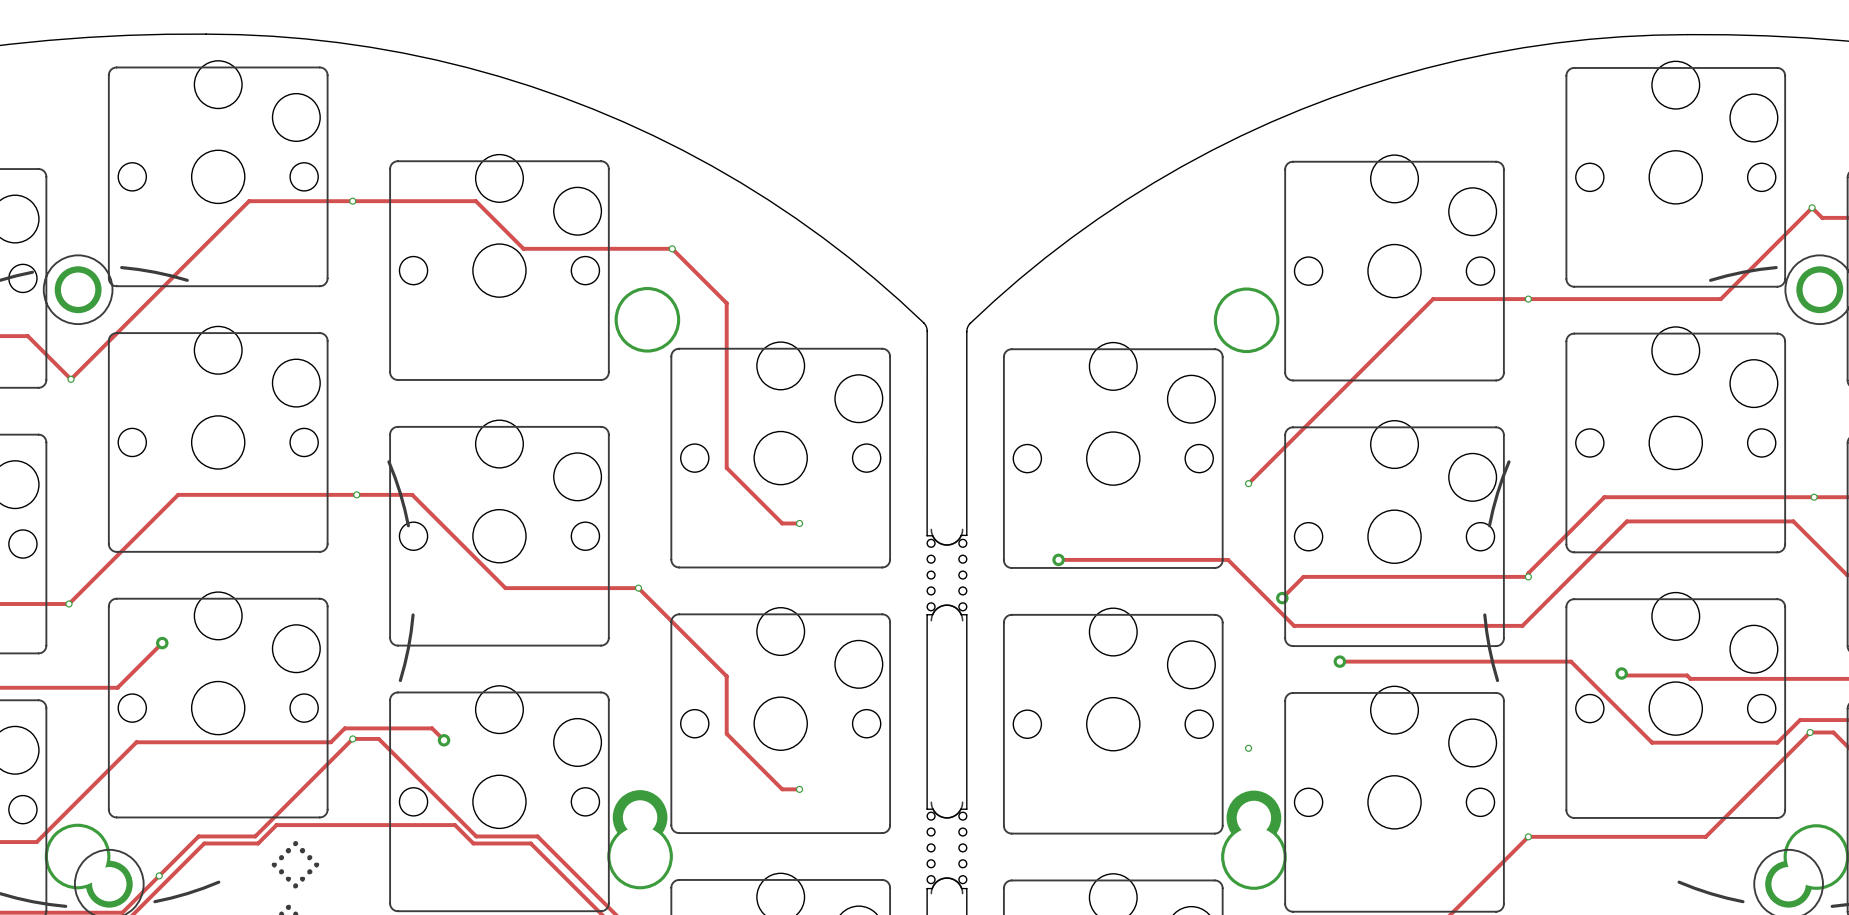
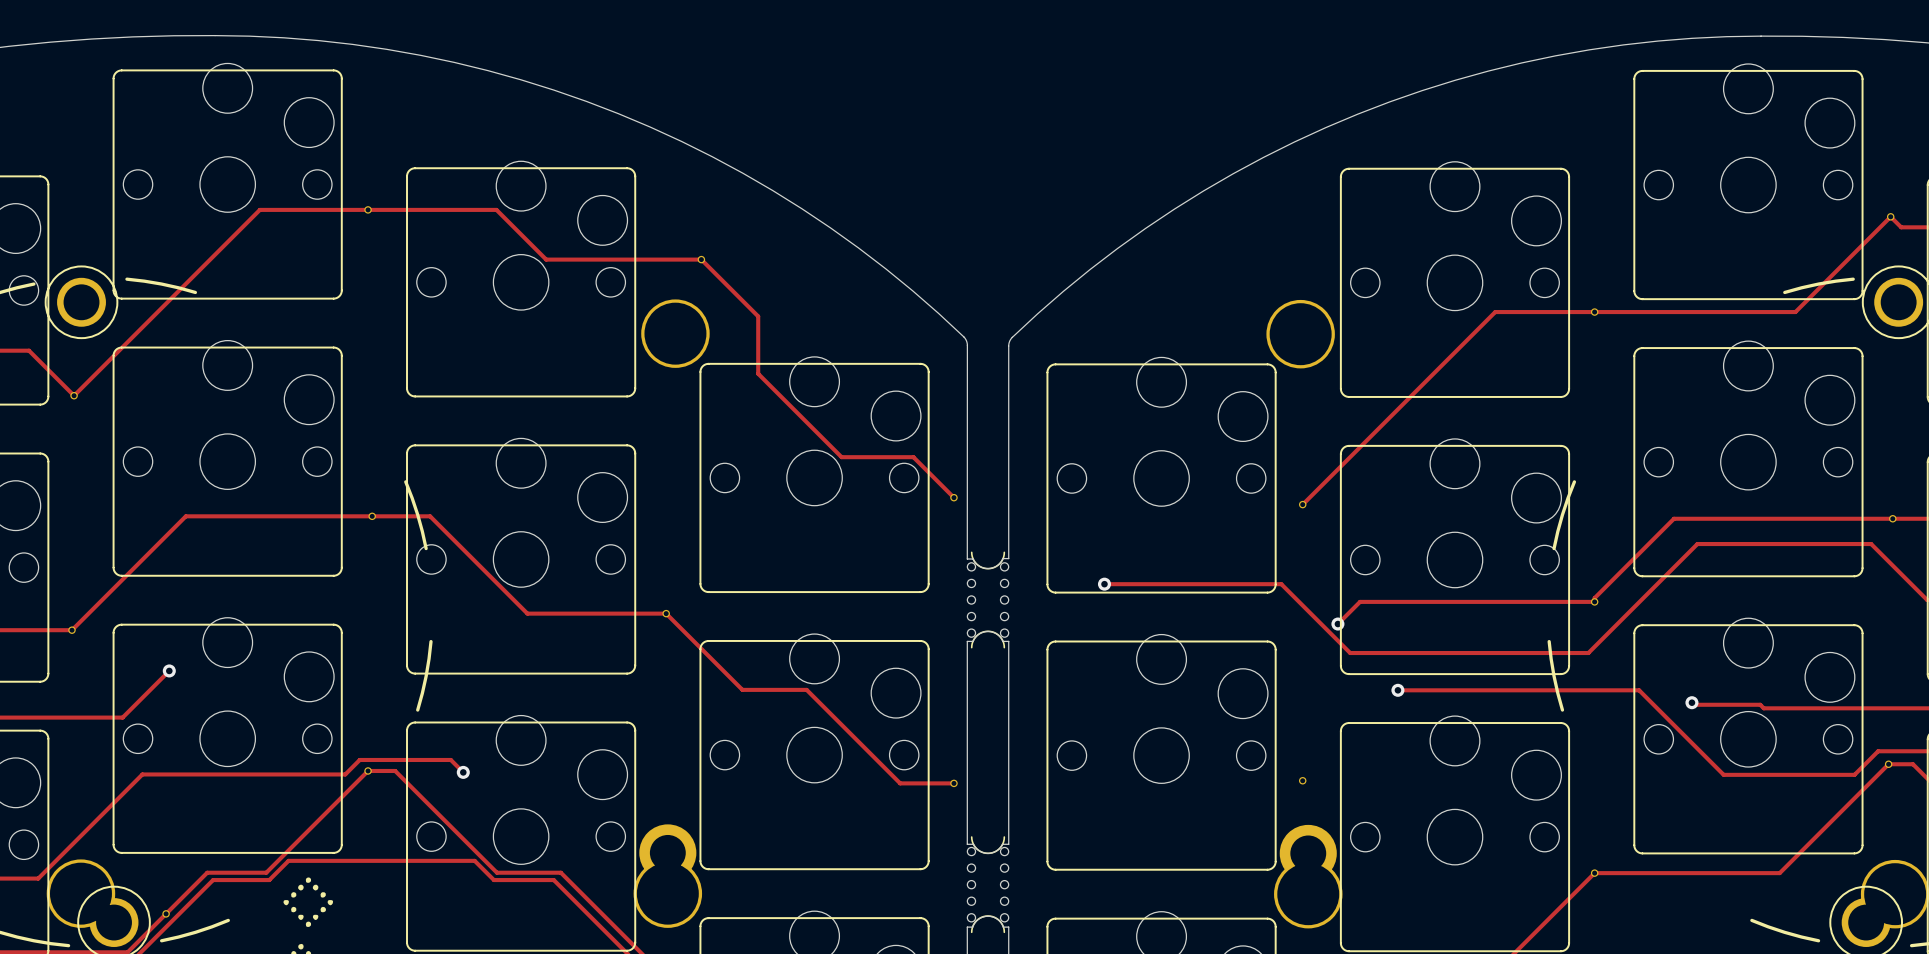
track: (726, 358) (726, 467) (782, 523) (799, 523) -> (758, 373) (841, 457) (913, 457) (953, 497)
part position: (799, 523) -> (953, 497)
track: (711, 661) (726, 676) (726, 733) (782, 789) (799, 789) -> (742, 689) (806, 689) (900, 783) (953, 783)
part position: (799, 789) -> (953, 783)

